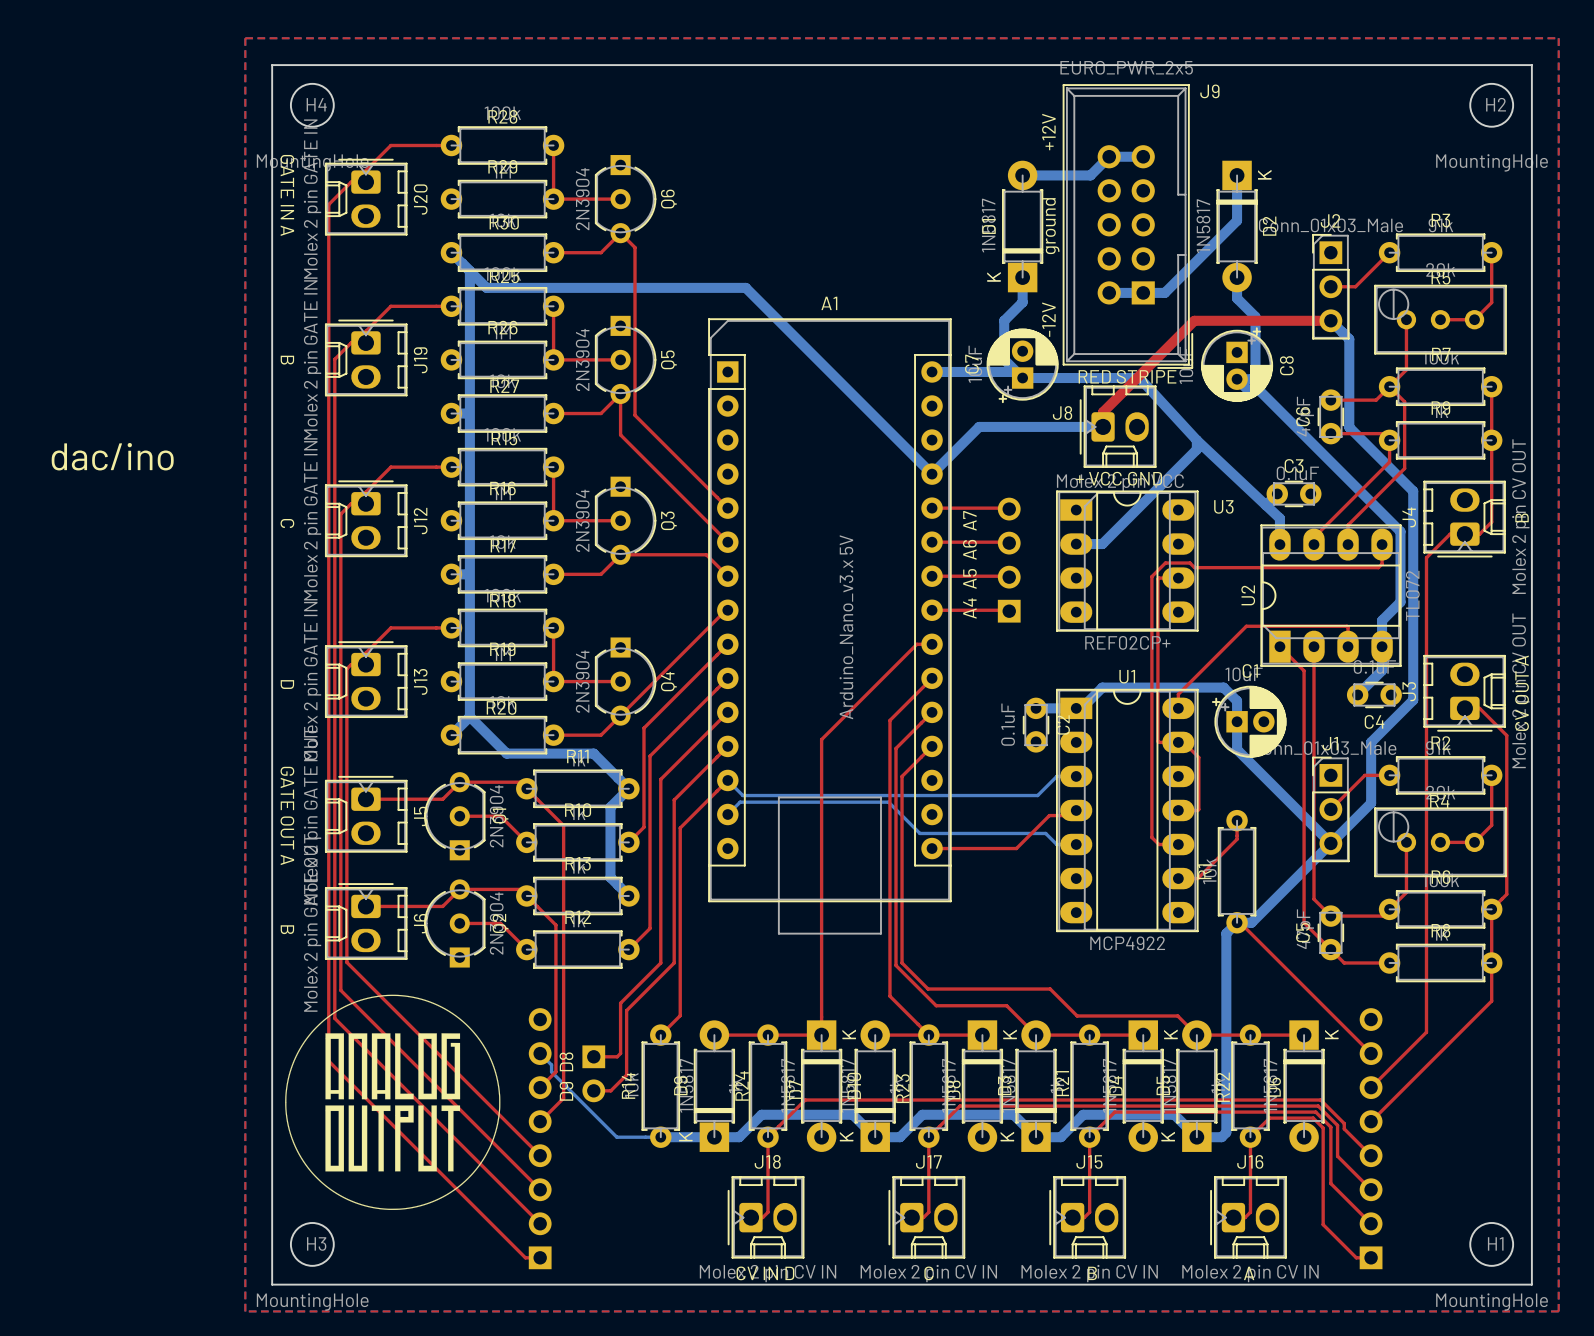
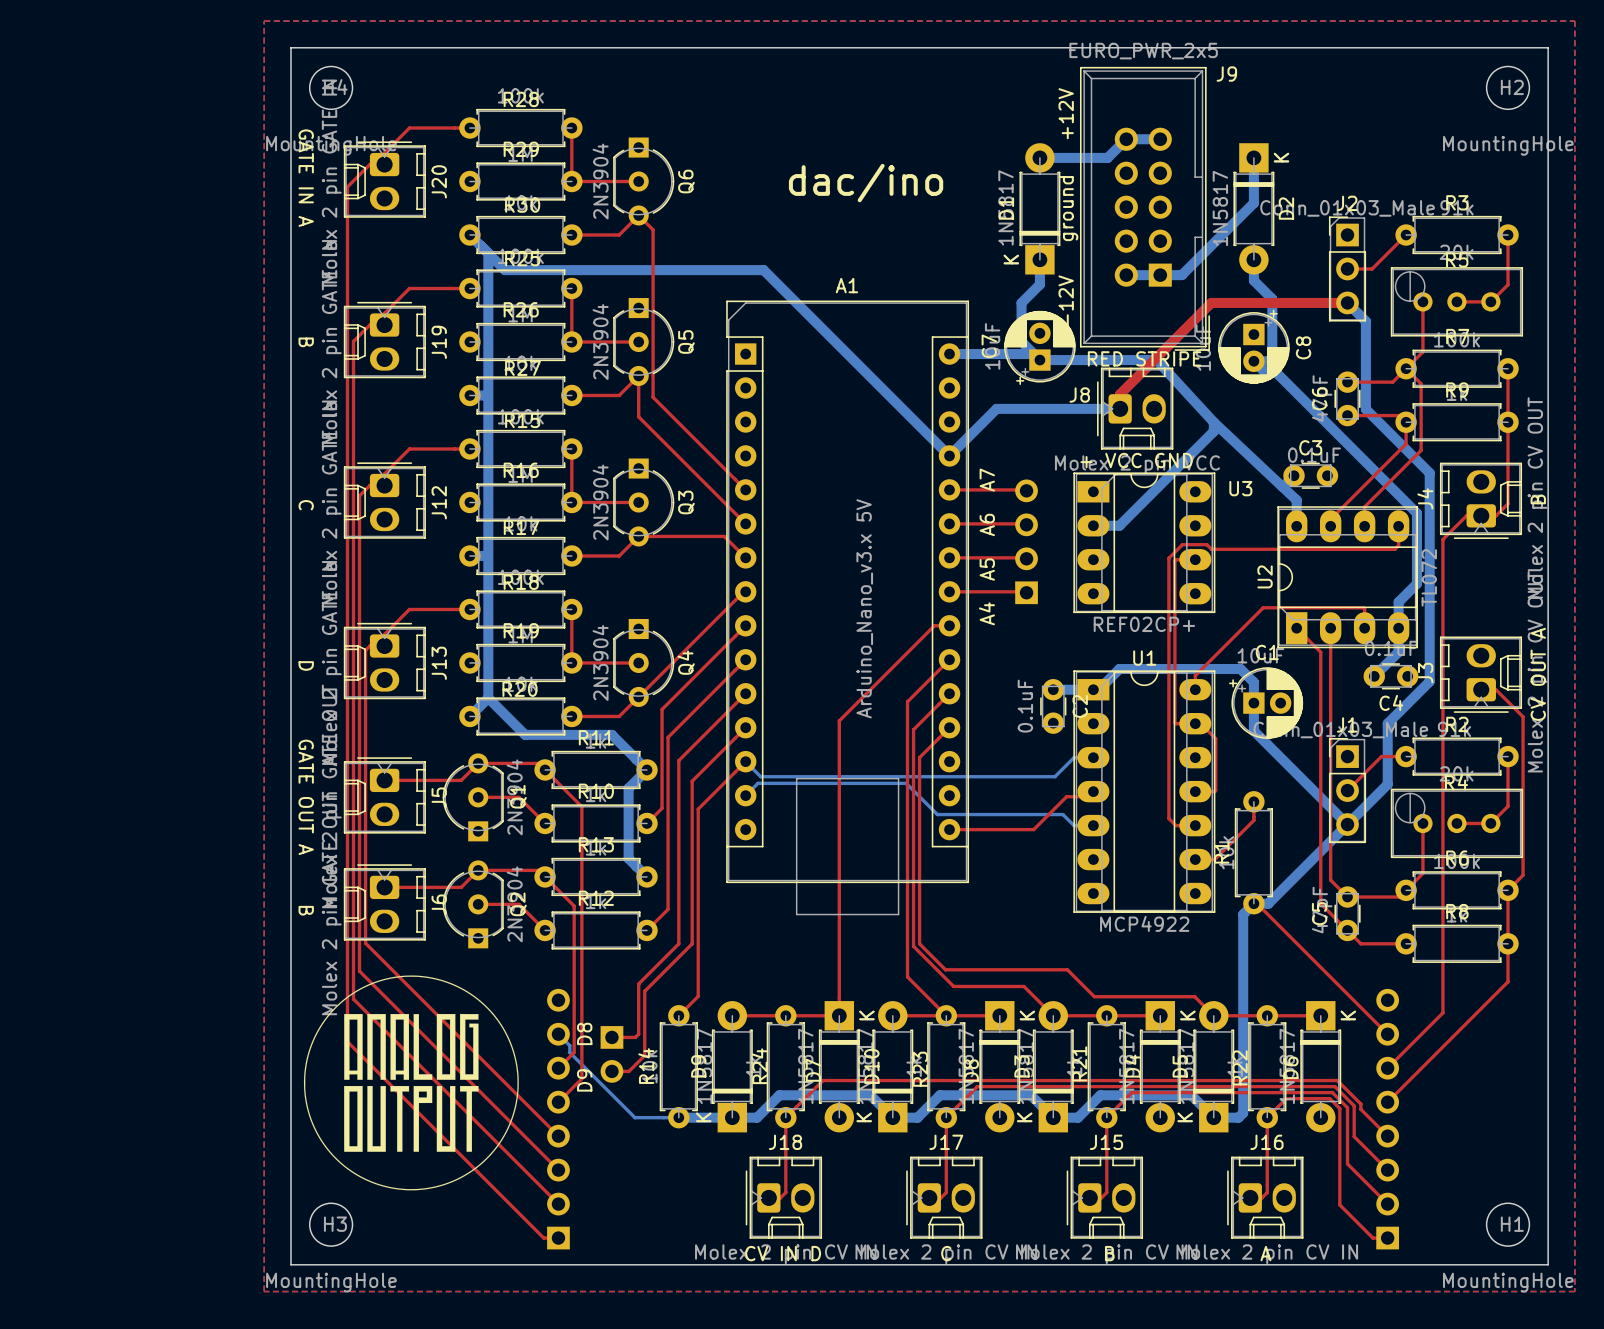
text: none -> dac/ino (866, 183)
text: dac/ino (112, 456) -> none

